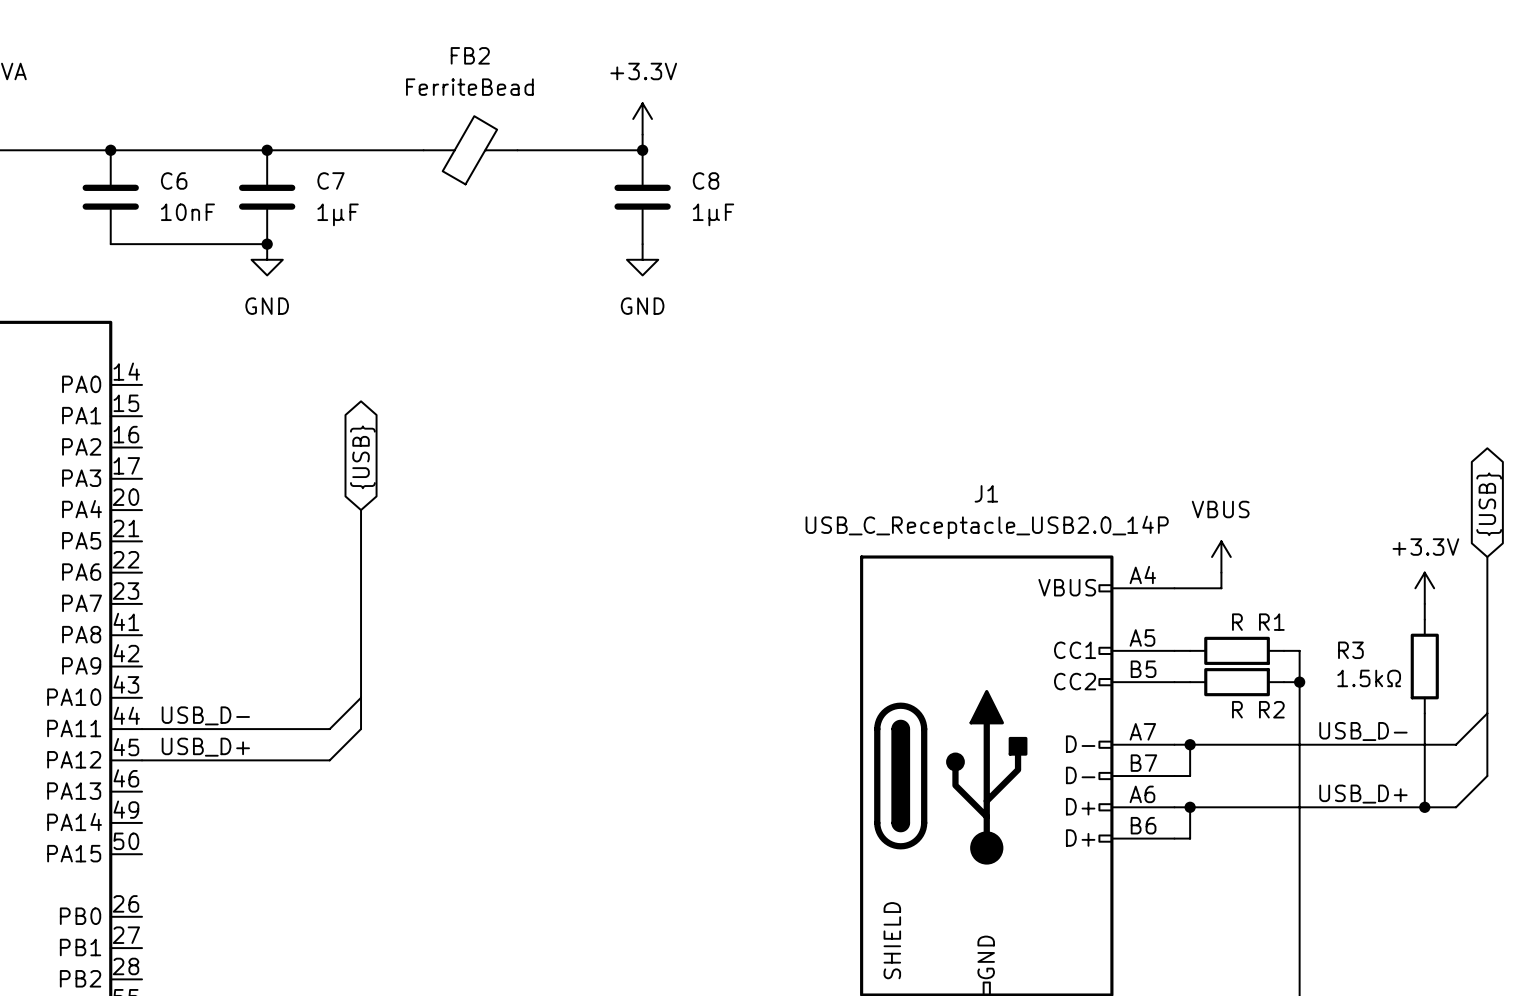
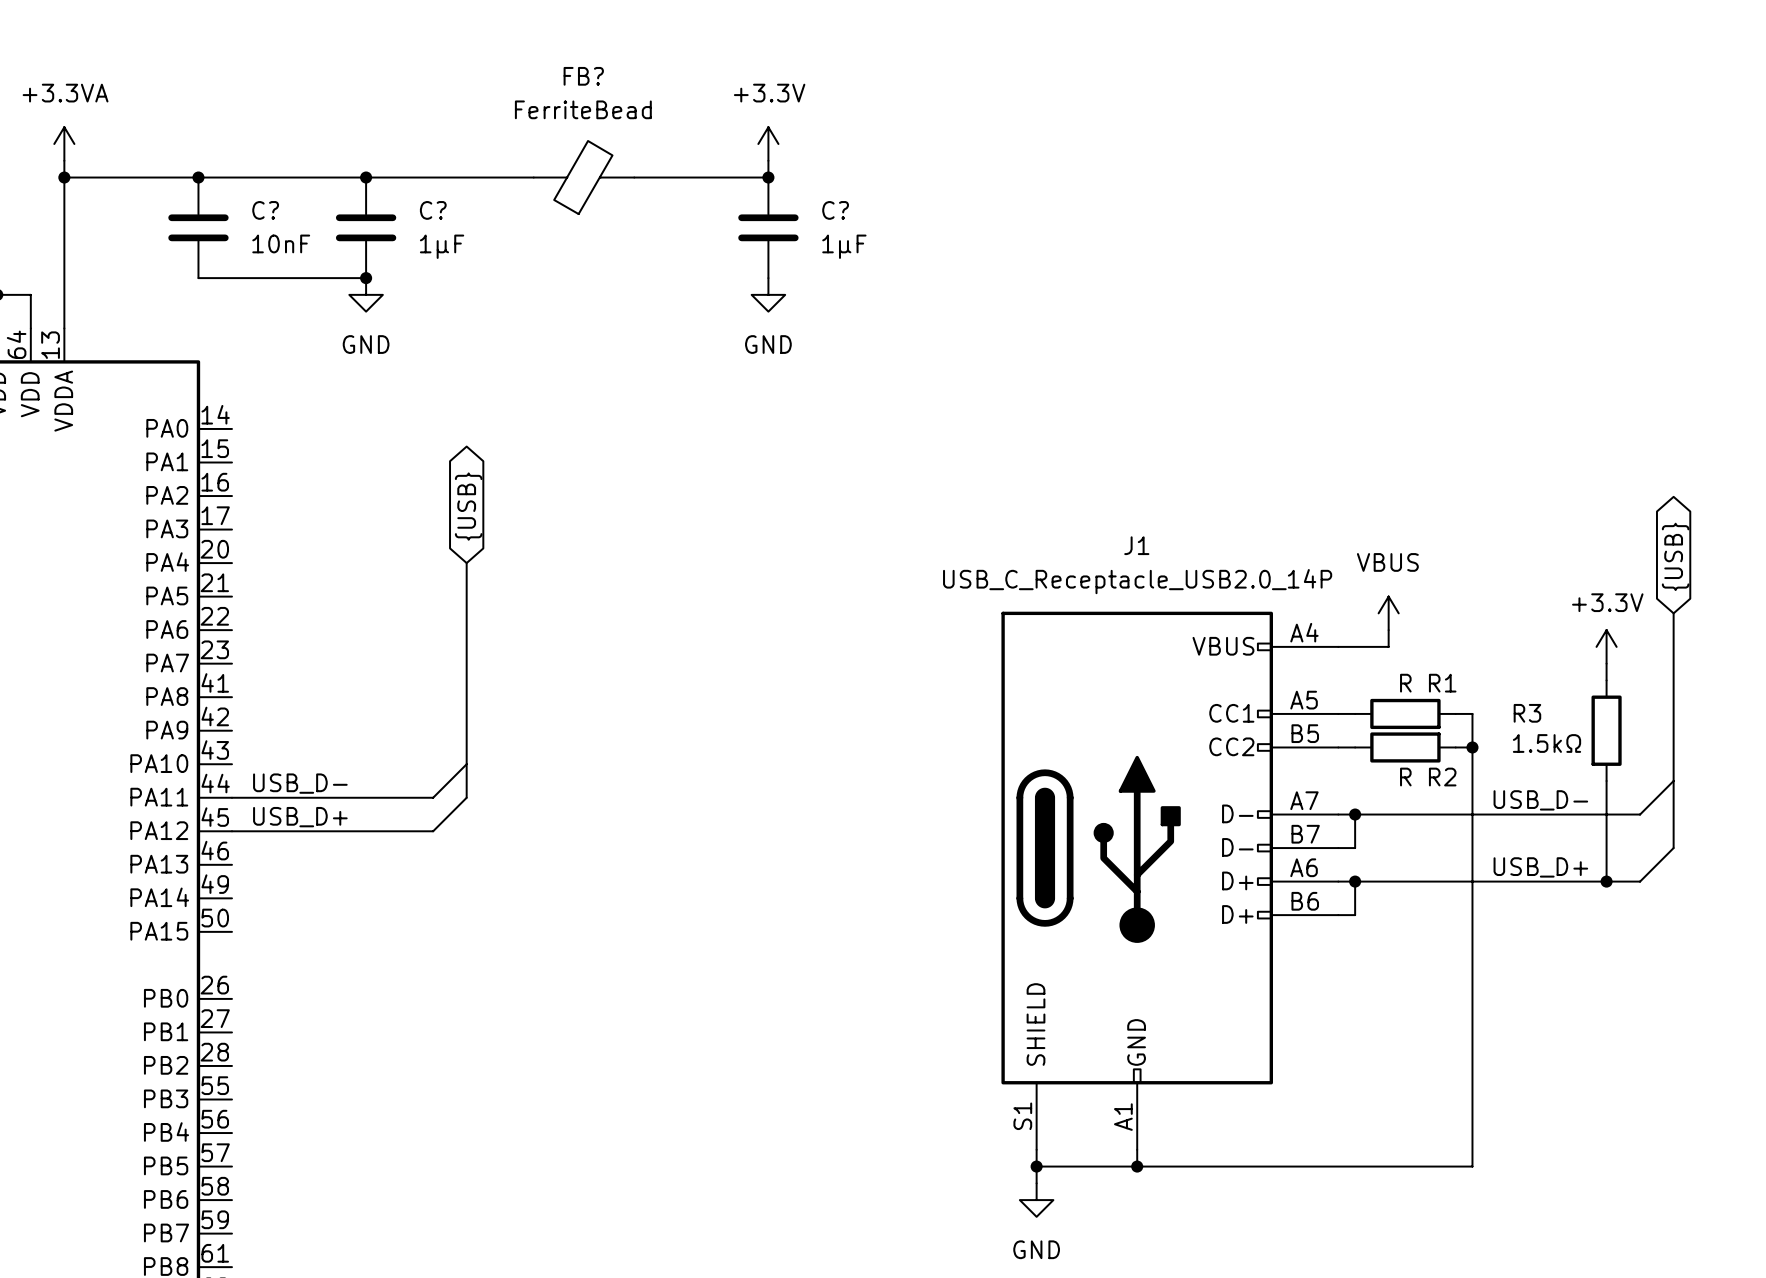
FB2 name: FB2 (470, 55) -> FB? (583, 76)
C6 name: C6 (174, 180) -> C? (265, 210)
C7 name: C7 (330, 180) -> C? (433, 210)
C8 name: C8 (706, 180) -> C? (835, 210)

